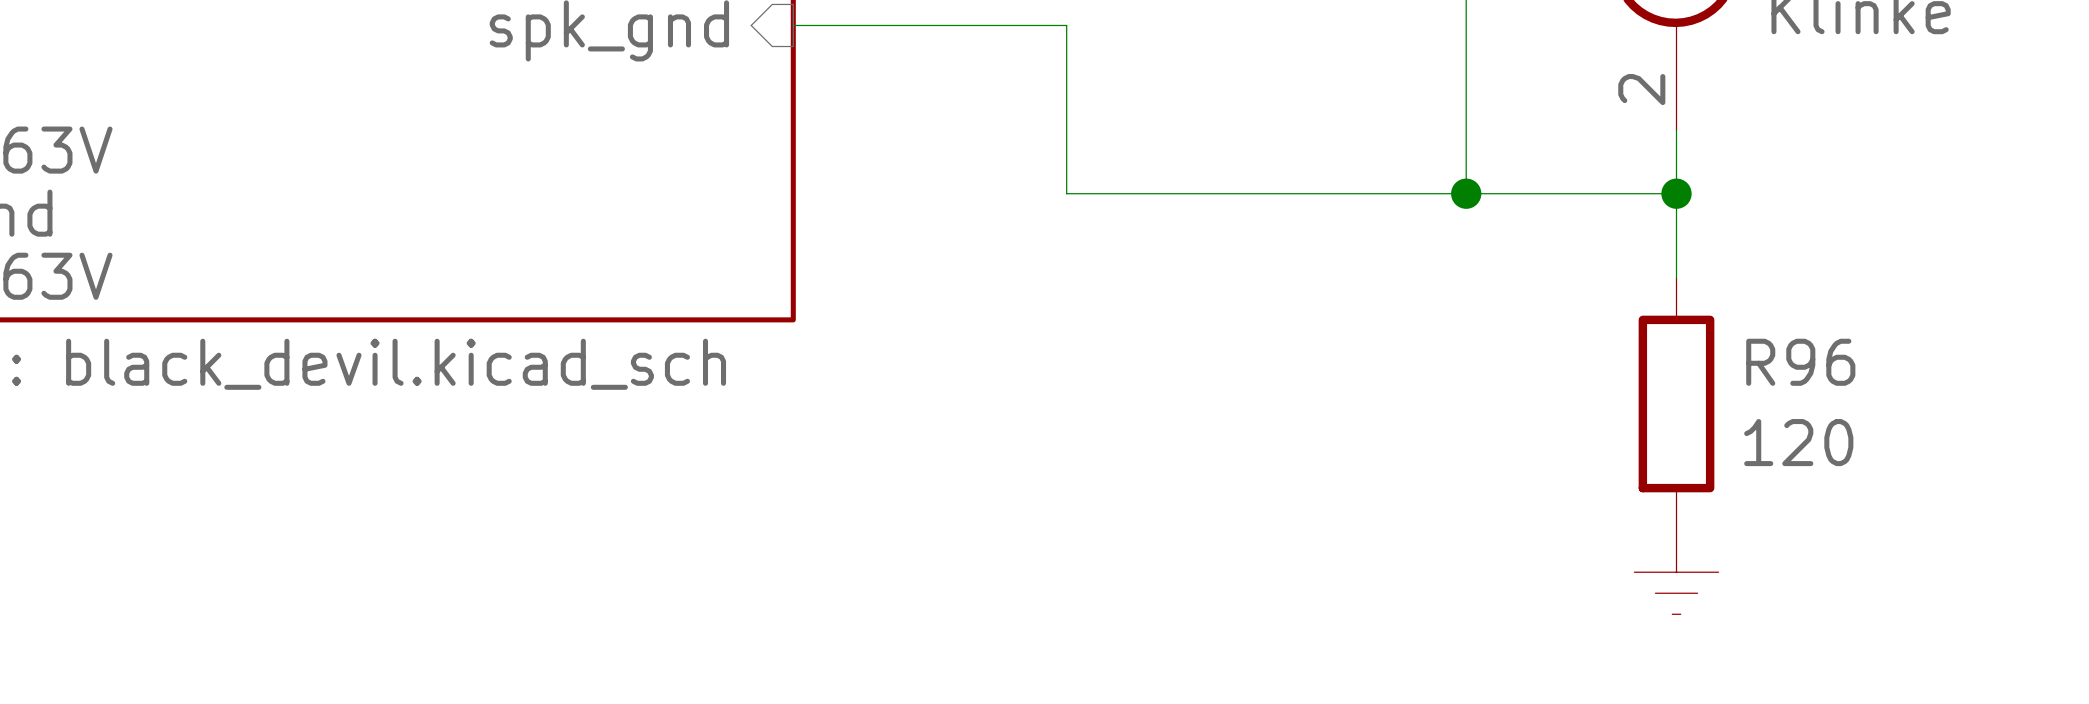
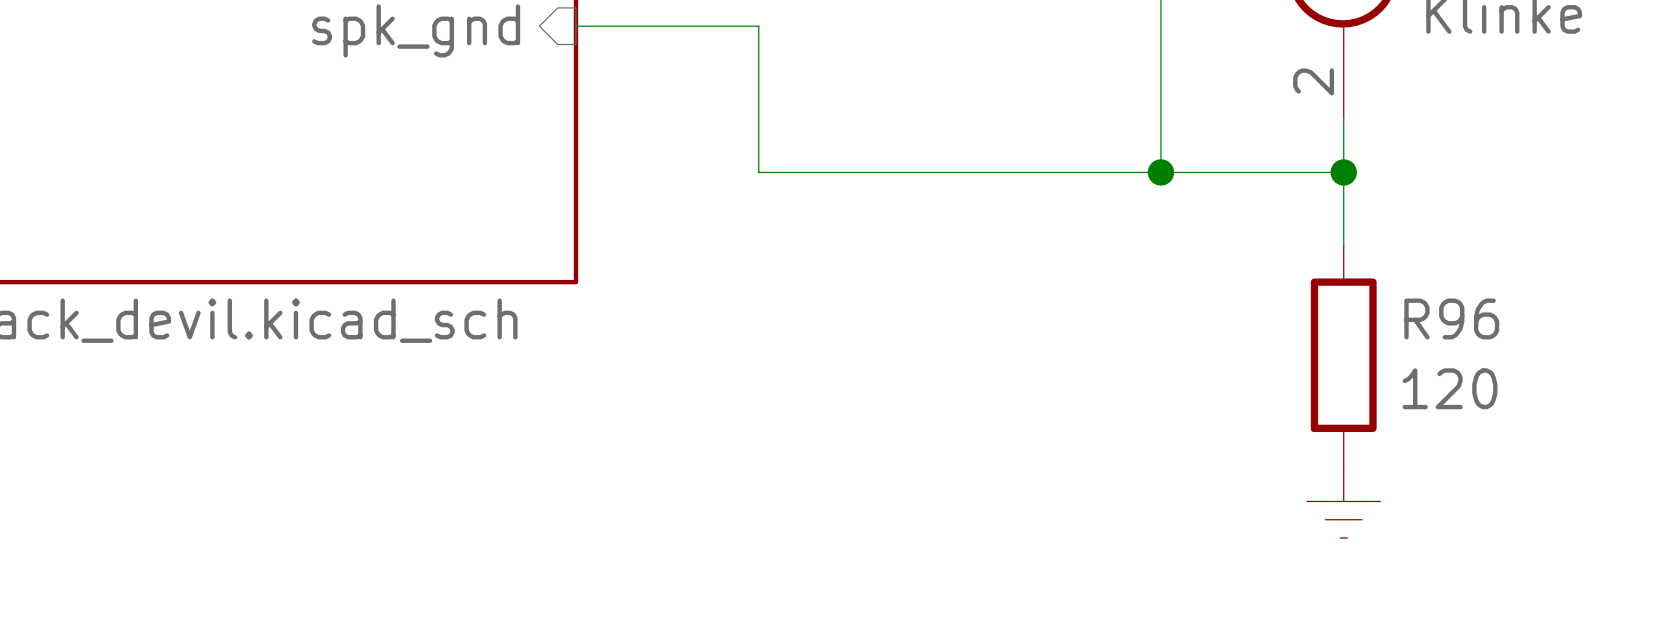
wire: (1003, 25) (1066, 25) (1066, 193) -> (758, 26) (758, 172) (813, 172)

